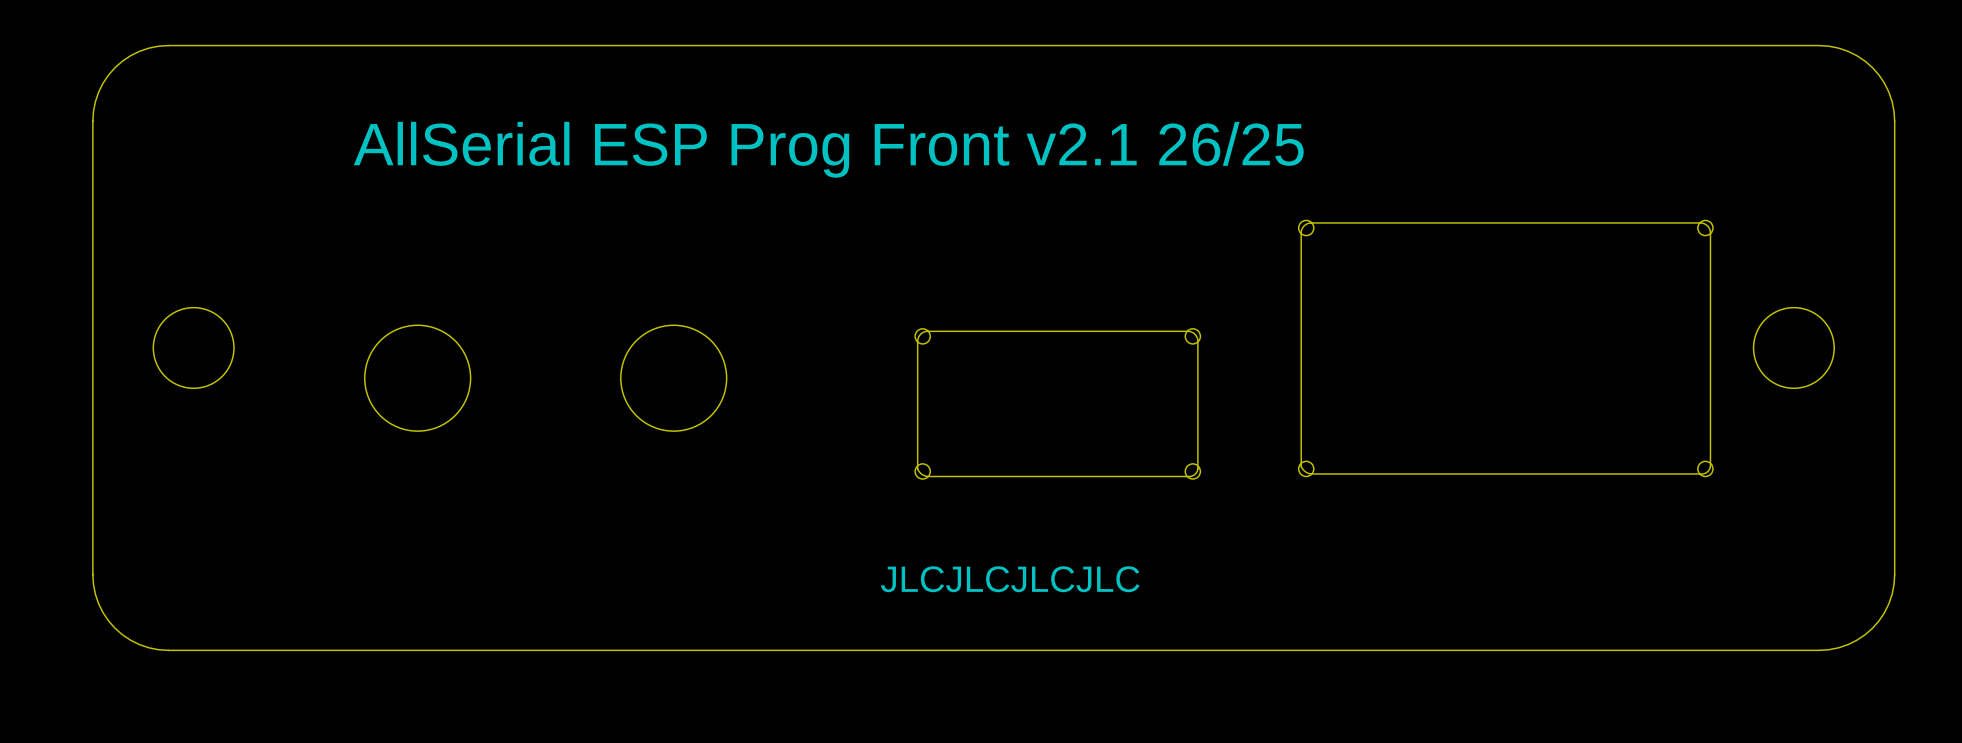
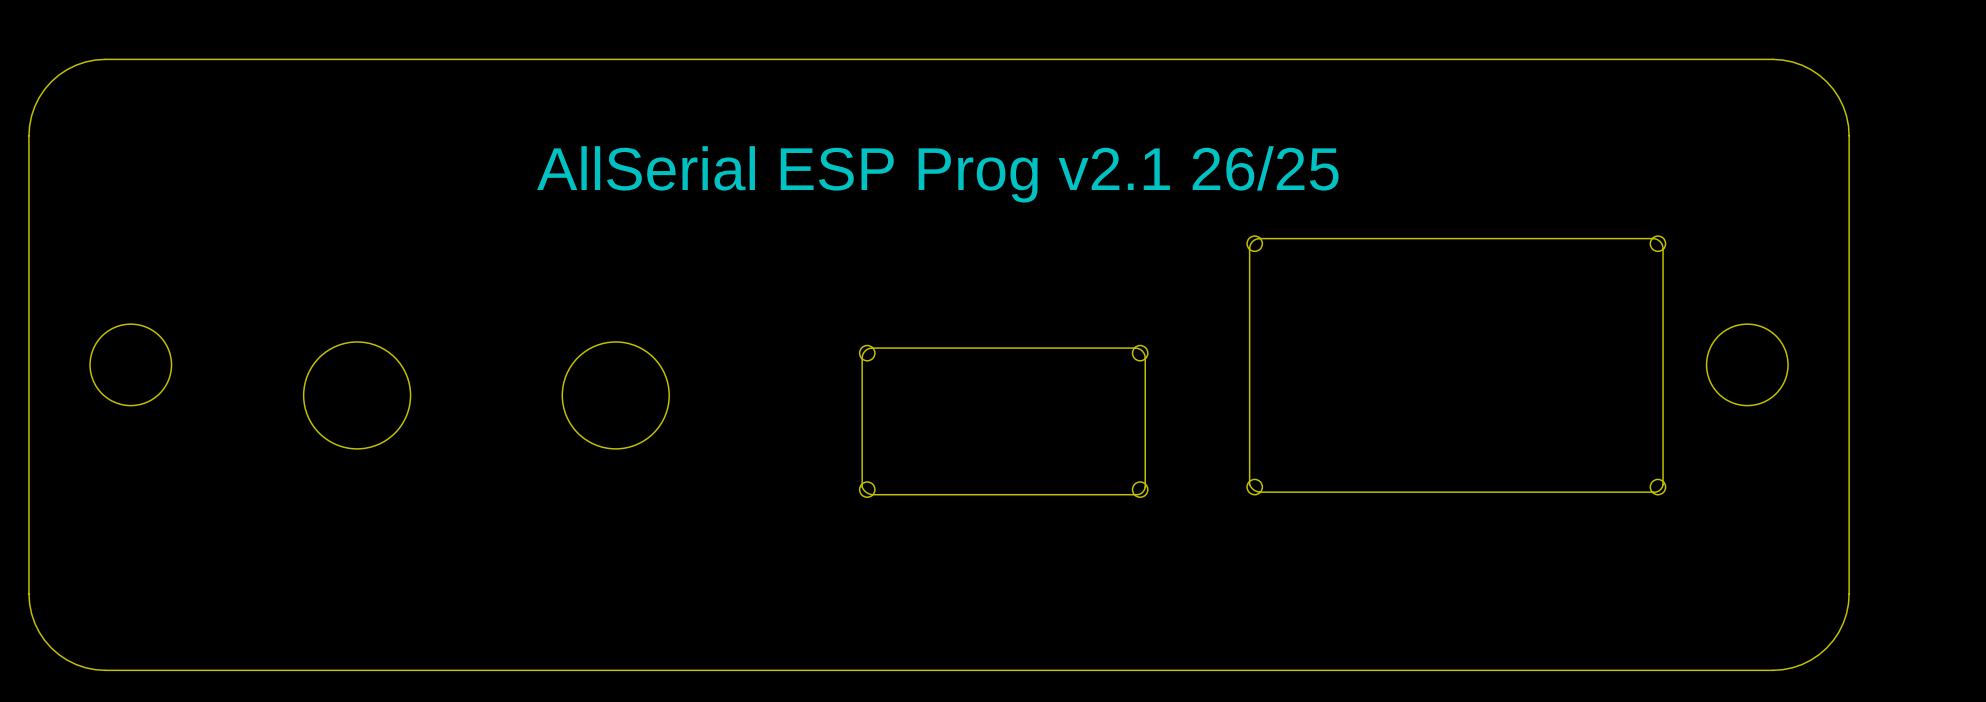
text: AllSerial ESP Prog Front v2.1 26/25 (828, 149) -> none
text: none -> AllSerial ESP Prog v2.1 26/25 (937, 174)
text: JLCJLCJLCJLC (1010, 579) -> none

